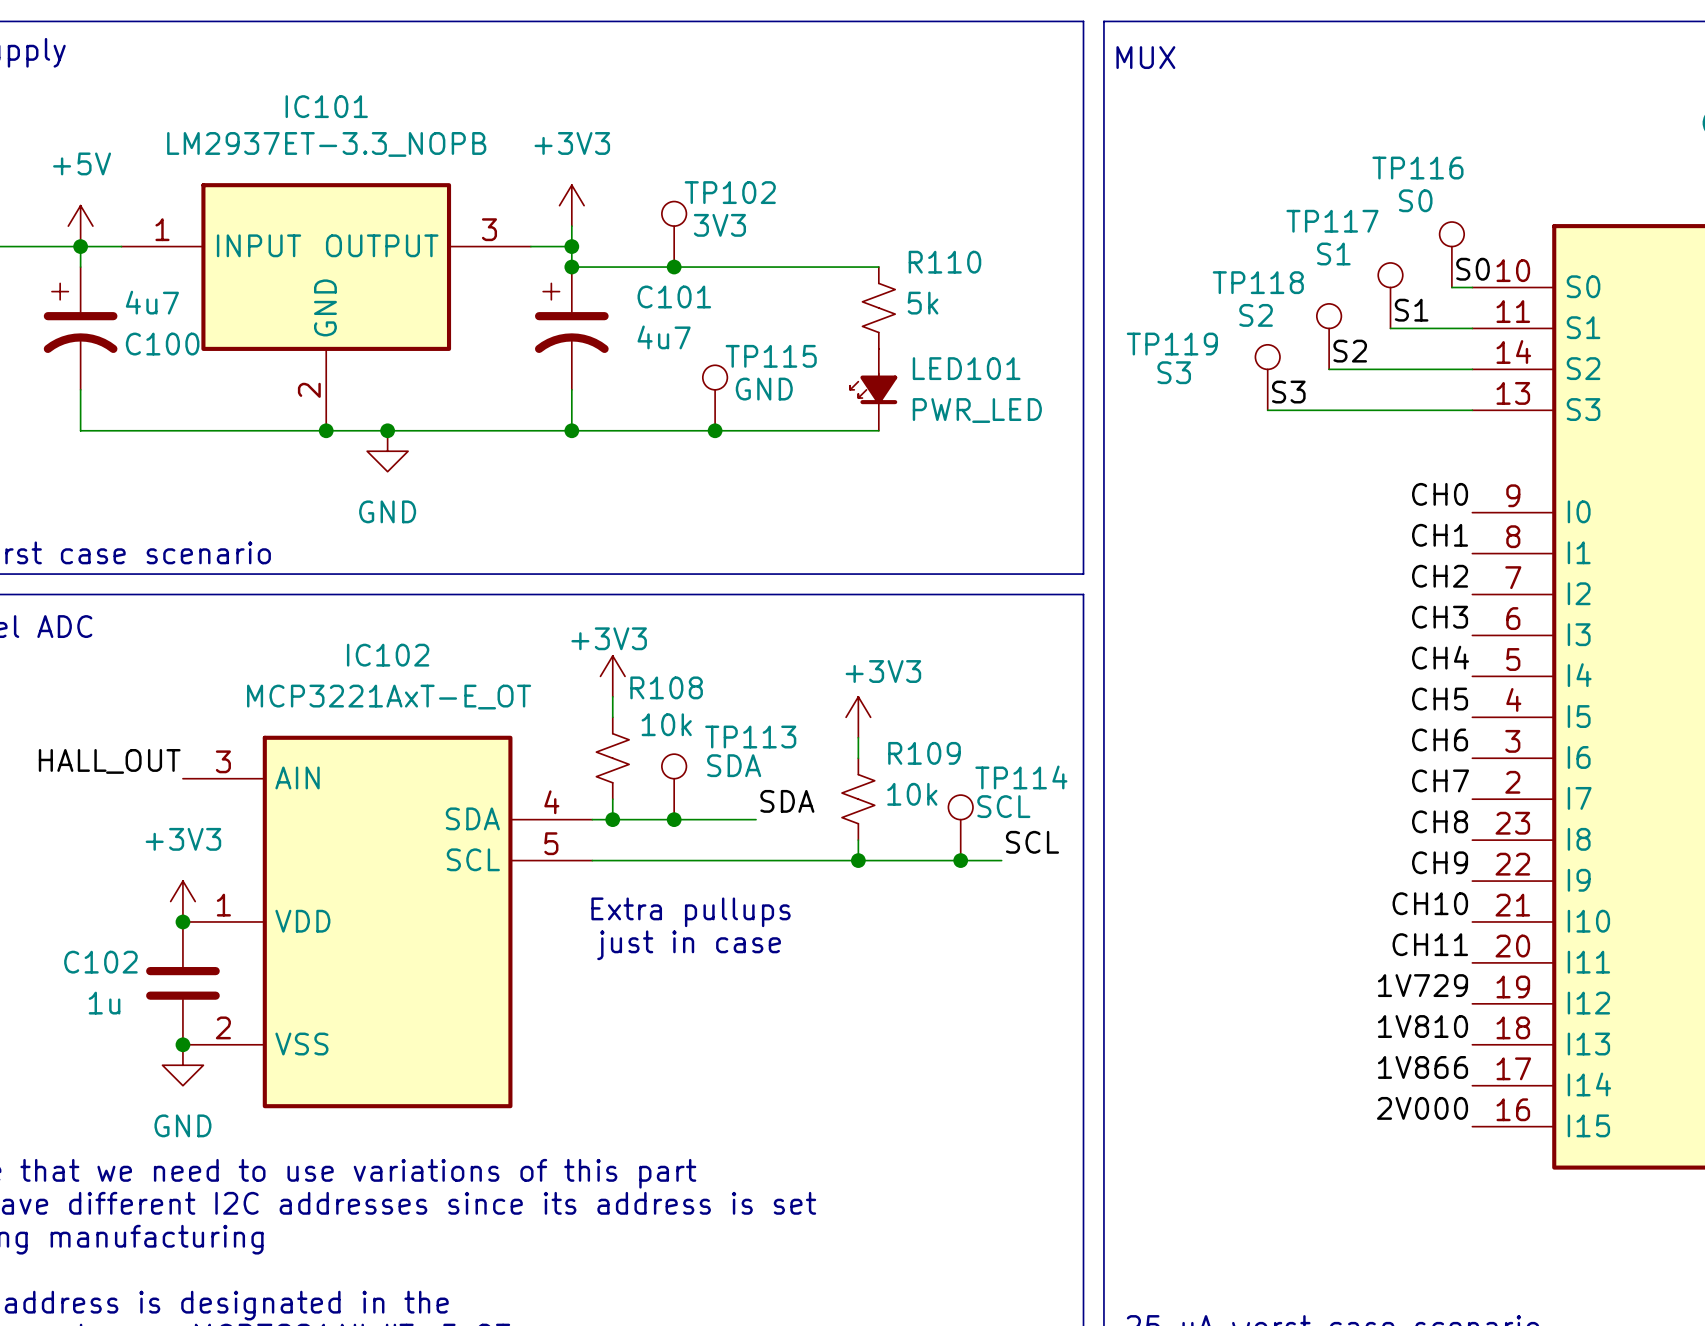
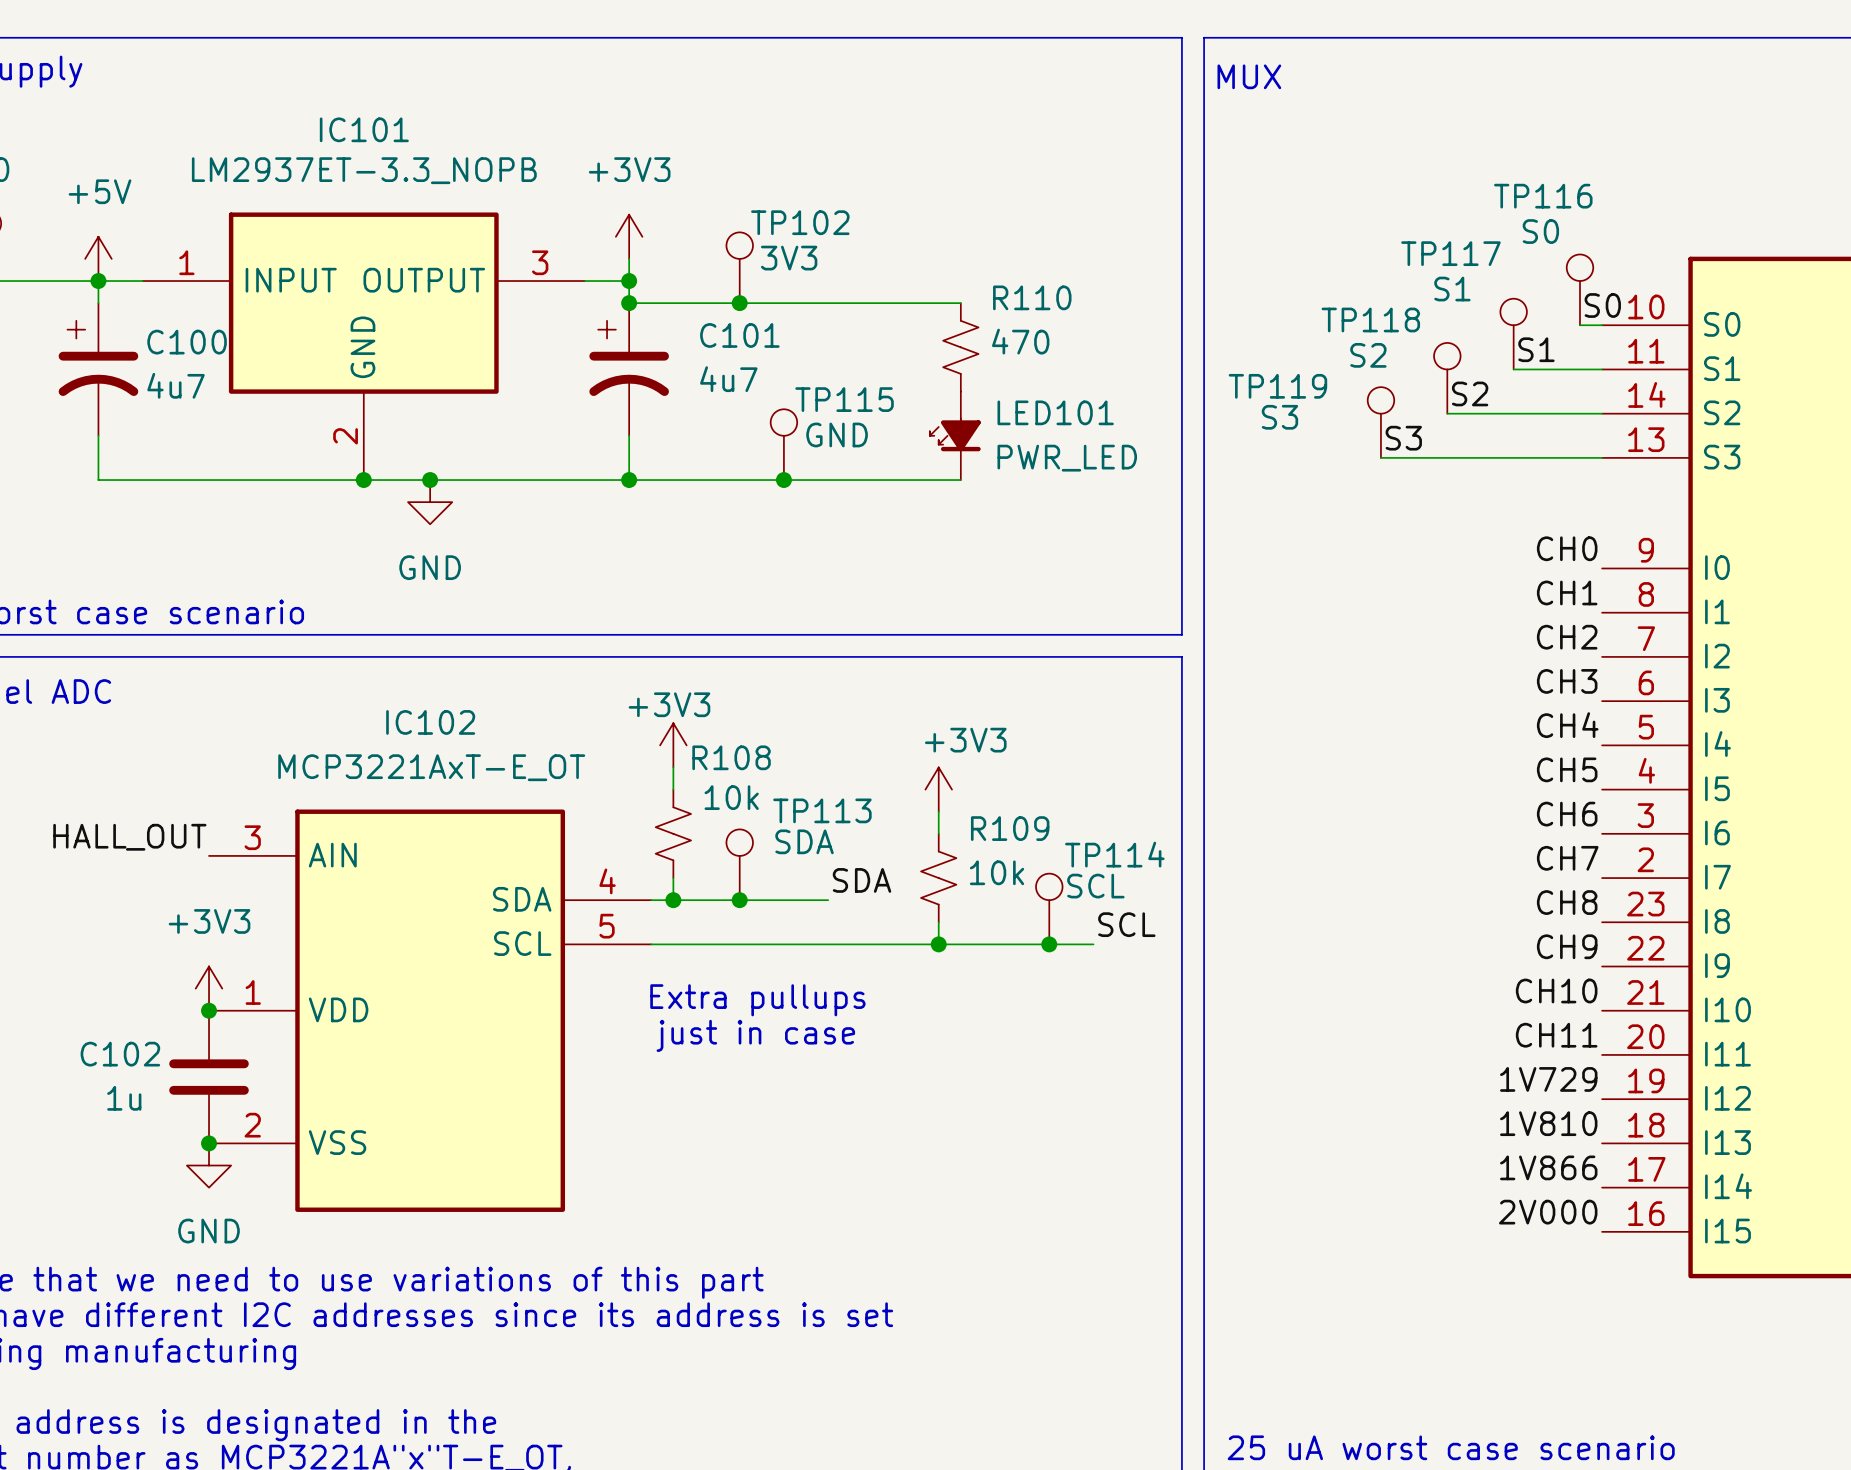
C100 value position: 4u7 (152, 302) -> 4u7 (176, 385)
R110 value: 5k (923, 303) -> 470 (1020, 341)
C100 name position: C100 (162, 344) -> C100 (187, 342)

